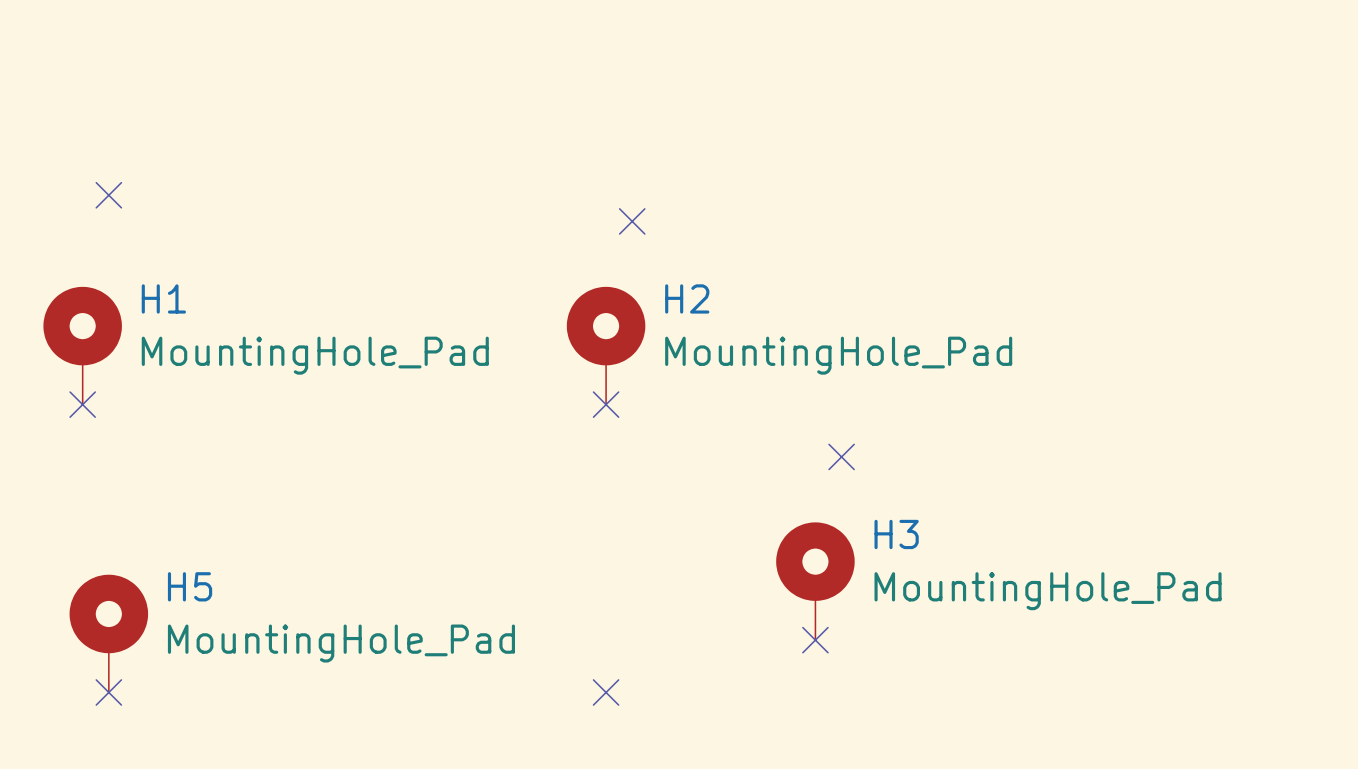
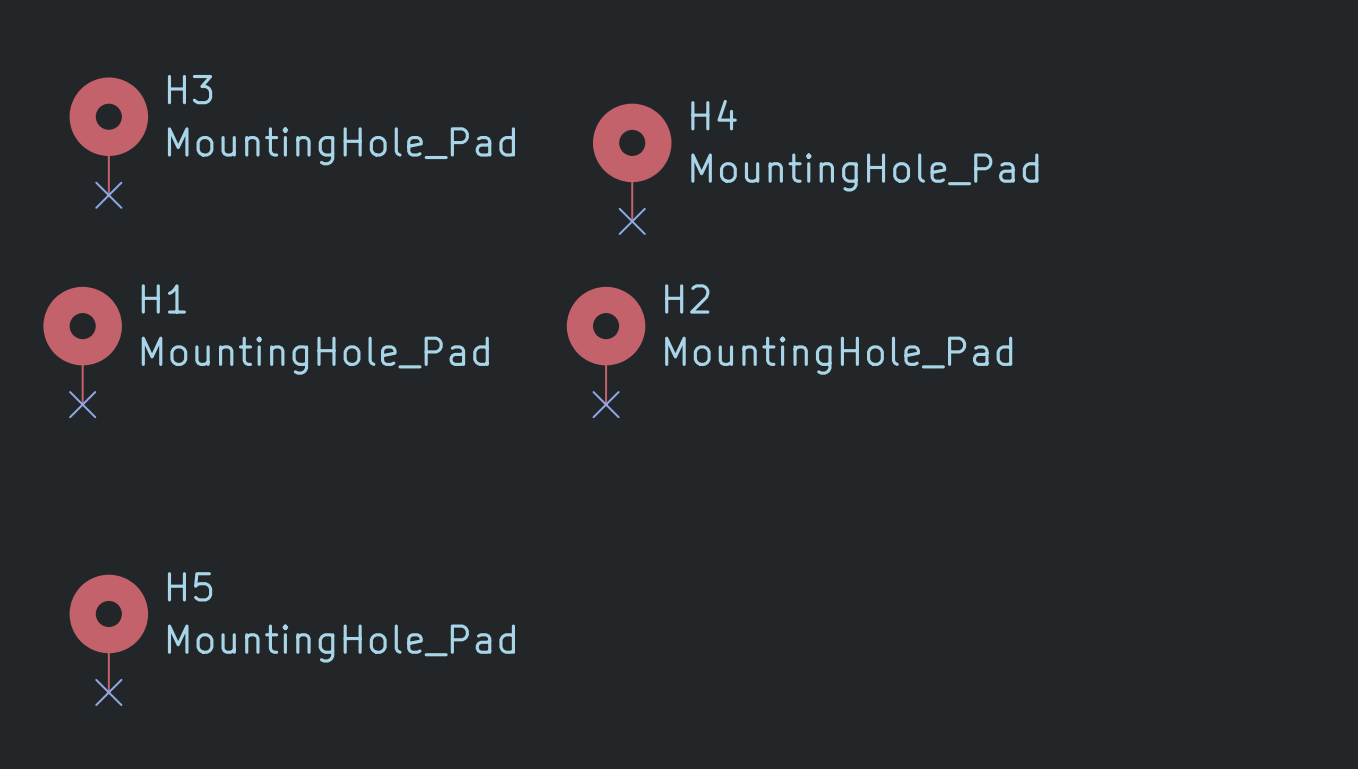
H4: none -> MountingHole_Pad (632, 162)
no-connect mark: (841, 456) -> none
H3 position: (815, 581) -> (108, 136)
no-connect mark: (815, 640) -> none
no-connect mark: (606, 692) -> none

